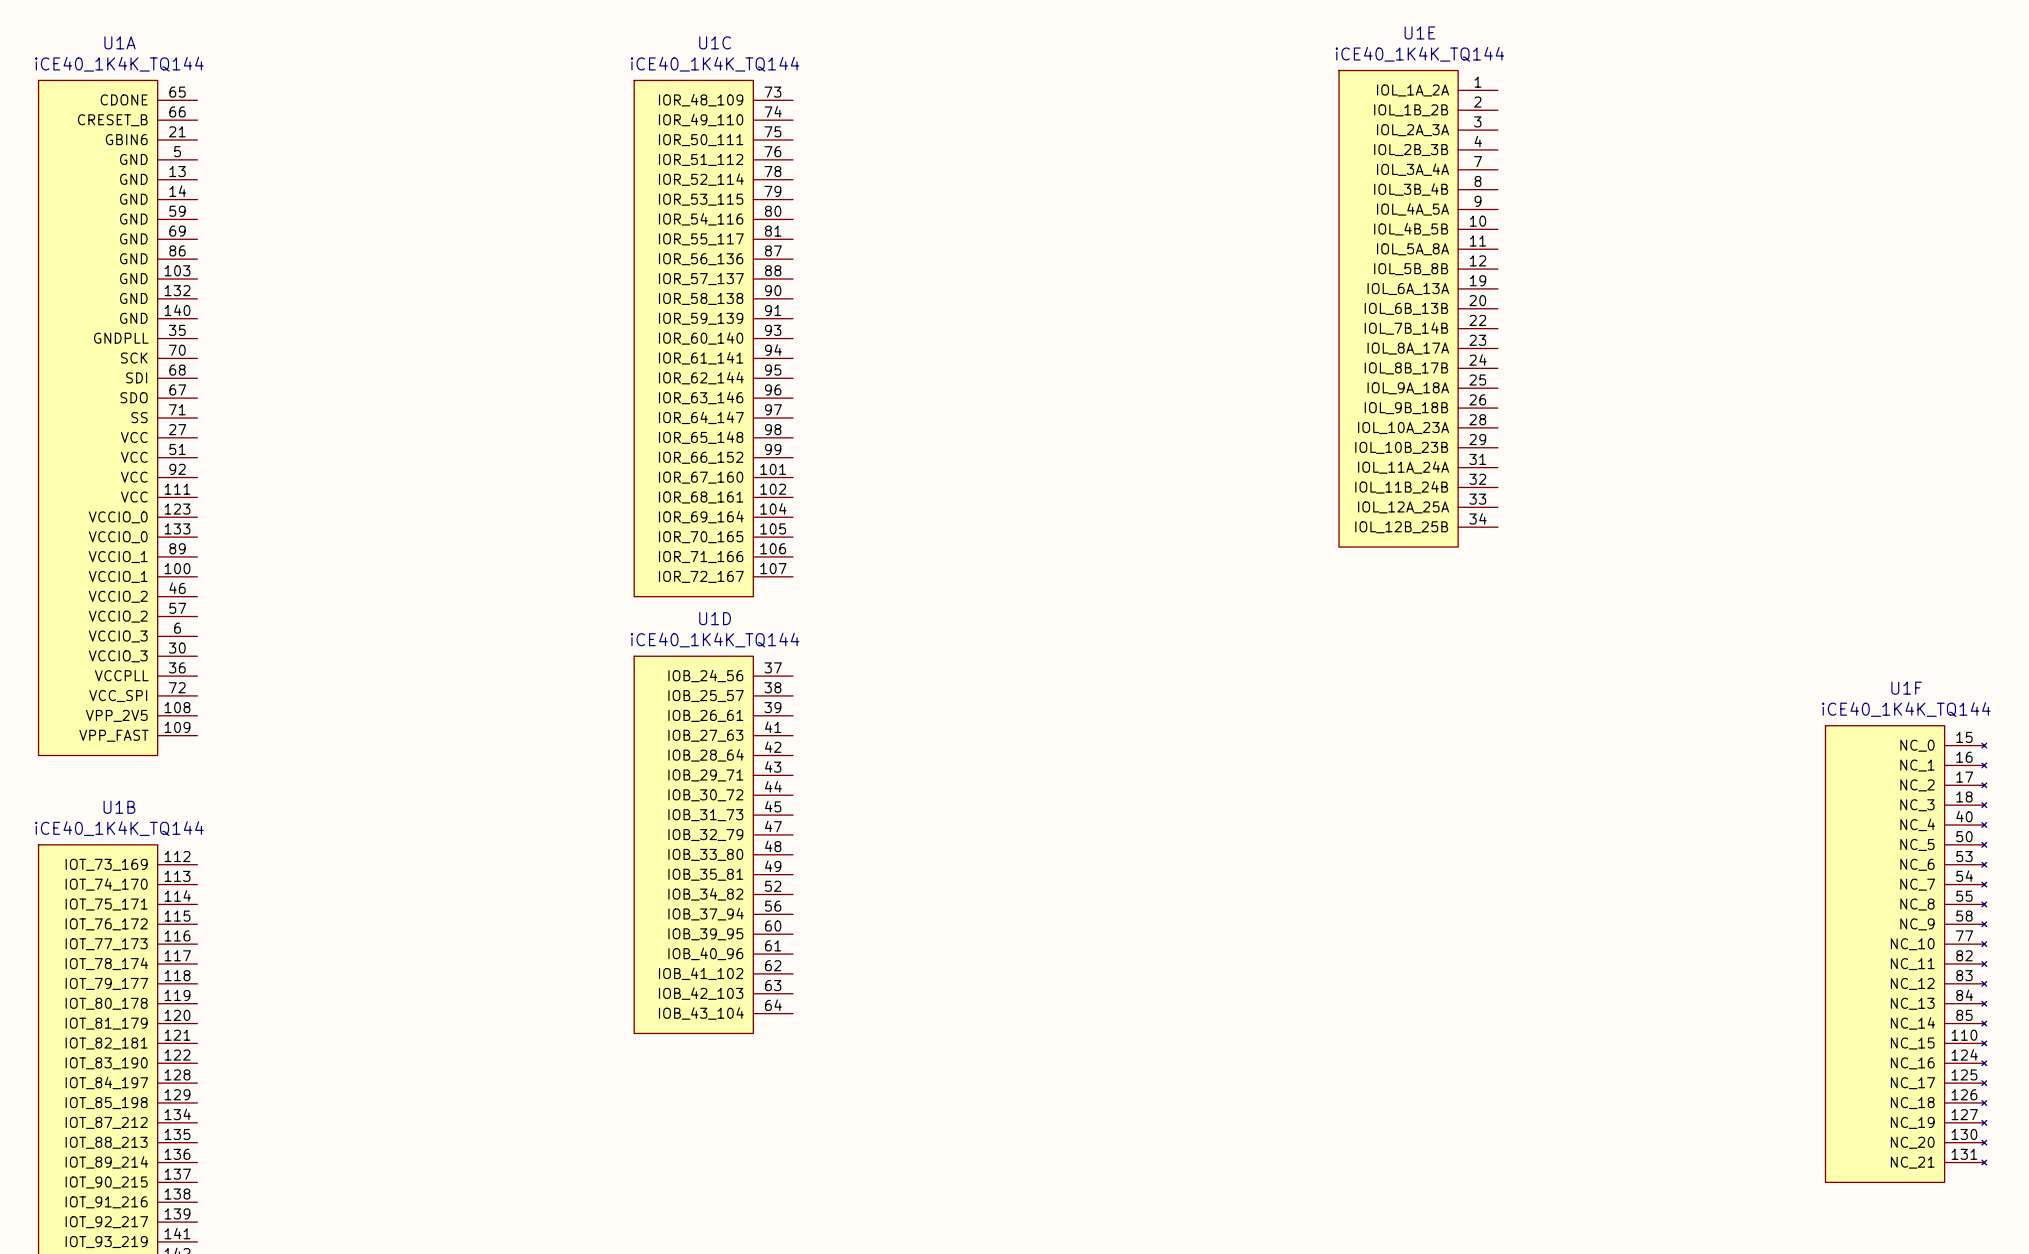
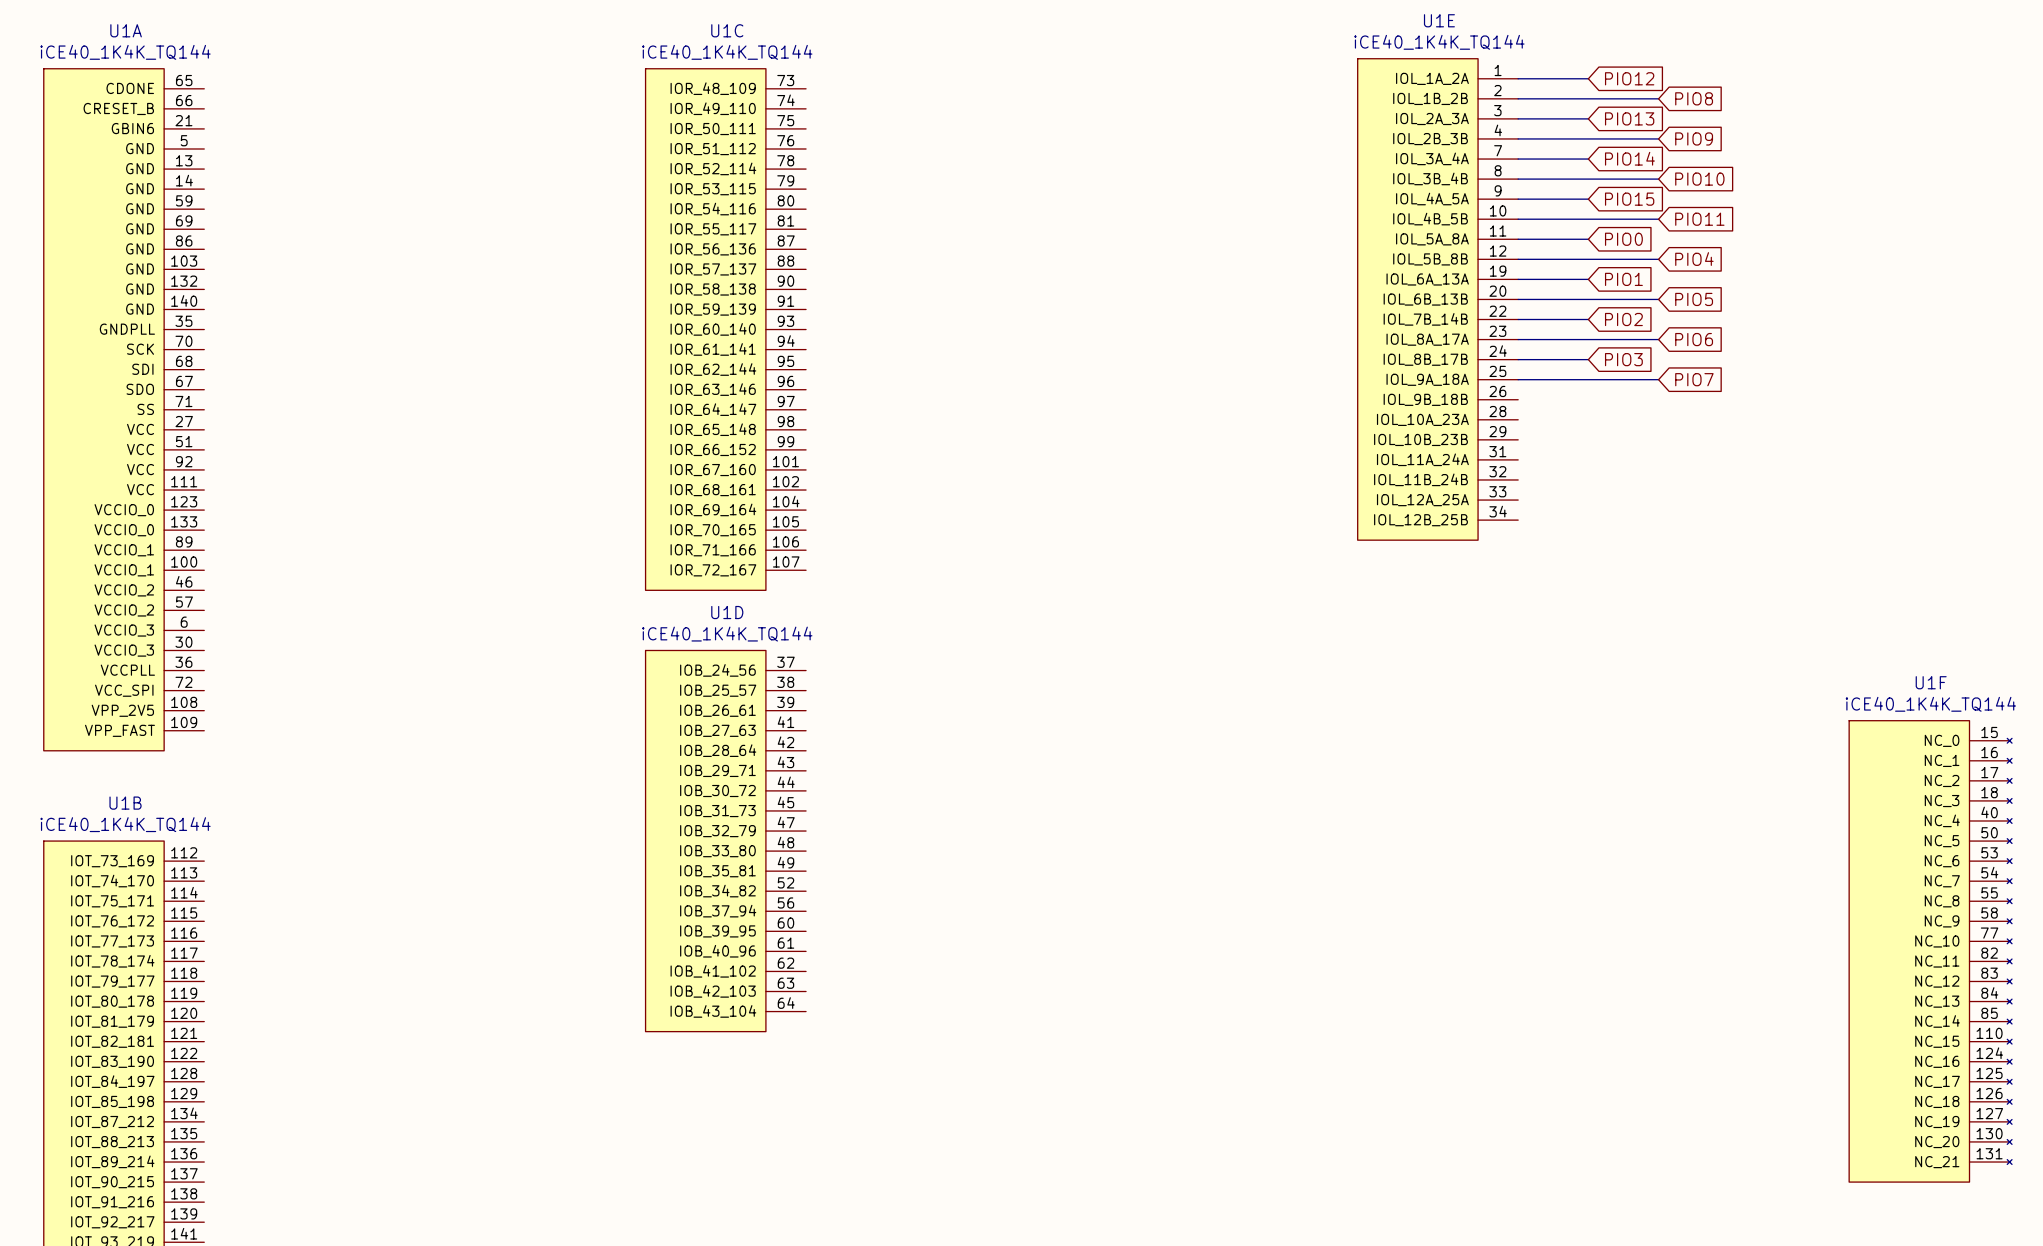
wire: none -> (1518, 78) (1588, 78)
global label: none -> PIO12 (1629, 78)
wire: none -> (1518, 98) (1658, 98)
global label: none -> PIO8 (1694, 98)
wire: none -> (1518, 118) (1588, 118)
global label: none -> PIO13 (1629, 118)
wire: none -> (1518, 138) (1658, 138)
global label: none -> PIO9 (1694, 138)
wire: none -> (1518, 159) (1588, 159)
global label: none -> PIO14 (1629, 158)
wire: none -> (1518, 179) (1658, 179)
global label: none -> PIO10 (1699, 179)
wire: none -> (1518, 199) (1588, 199)
global label: none -> PIO15 (1629, 199)
wire: none -> (1518, 219) (1658, 219)
global label: none -> PIO11 (1699, 219)
wire: none -> (1518, 239) (1588, 239)
global label: none -> PIO0 (1623, 239)
global label: none -> PIO4 (1694, 259)
wire: none -> (1518, 259) (1658, 259)
wire: none -> (1518, 279) (1588, 279)
global label: none -> PIO1 (1623, 279)
wire: none -> (1518, 299) (1658, 299)
global label: none -> PIO5 (1694, 299)
wire: none -> (1518, 319) (1588, 319)
global label: none -> PIO2 (1623, 319)
wire: none -> (1518, 339) (1658, 339)
global label: none -> PIO6 (1694, 339)
wire: none -> (1518, 359) (1588, 359)
global label: none -> PIO3 (1623, 359)
wire: none -> (1518, 379) (1658, 379)
global label: none -> PIO7 (1694, 379)

